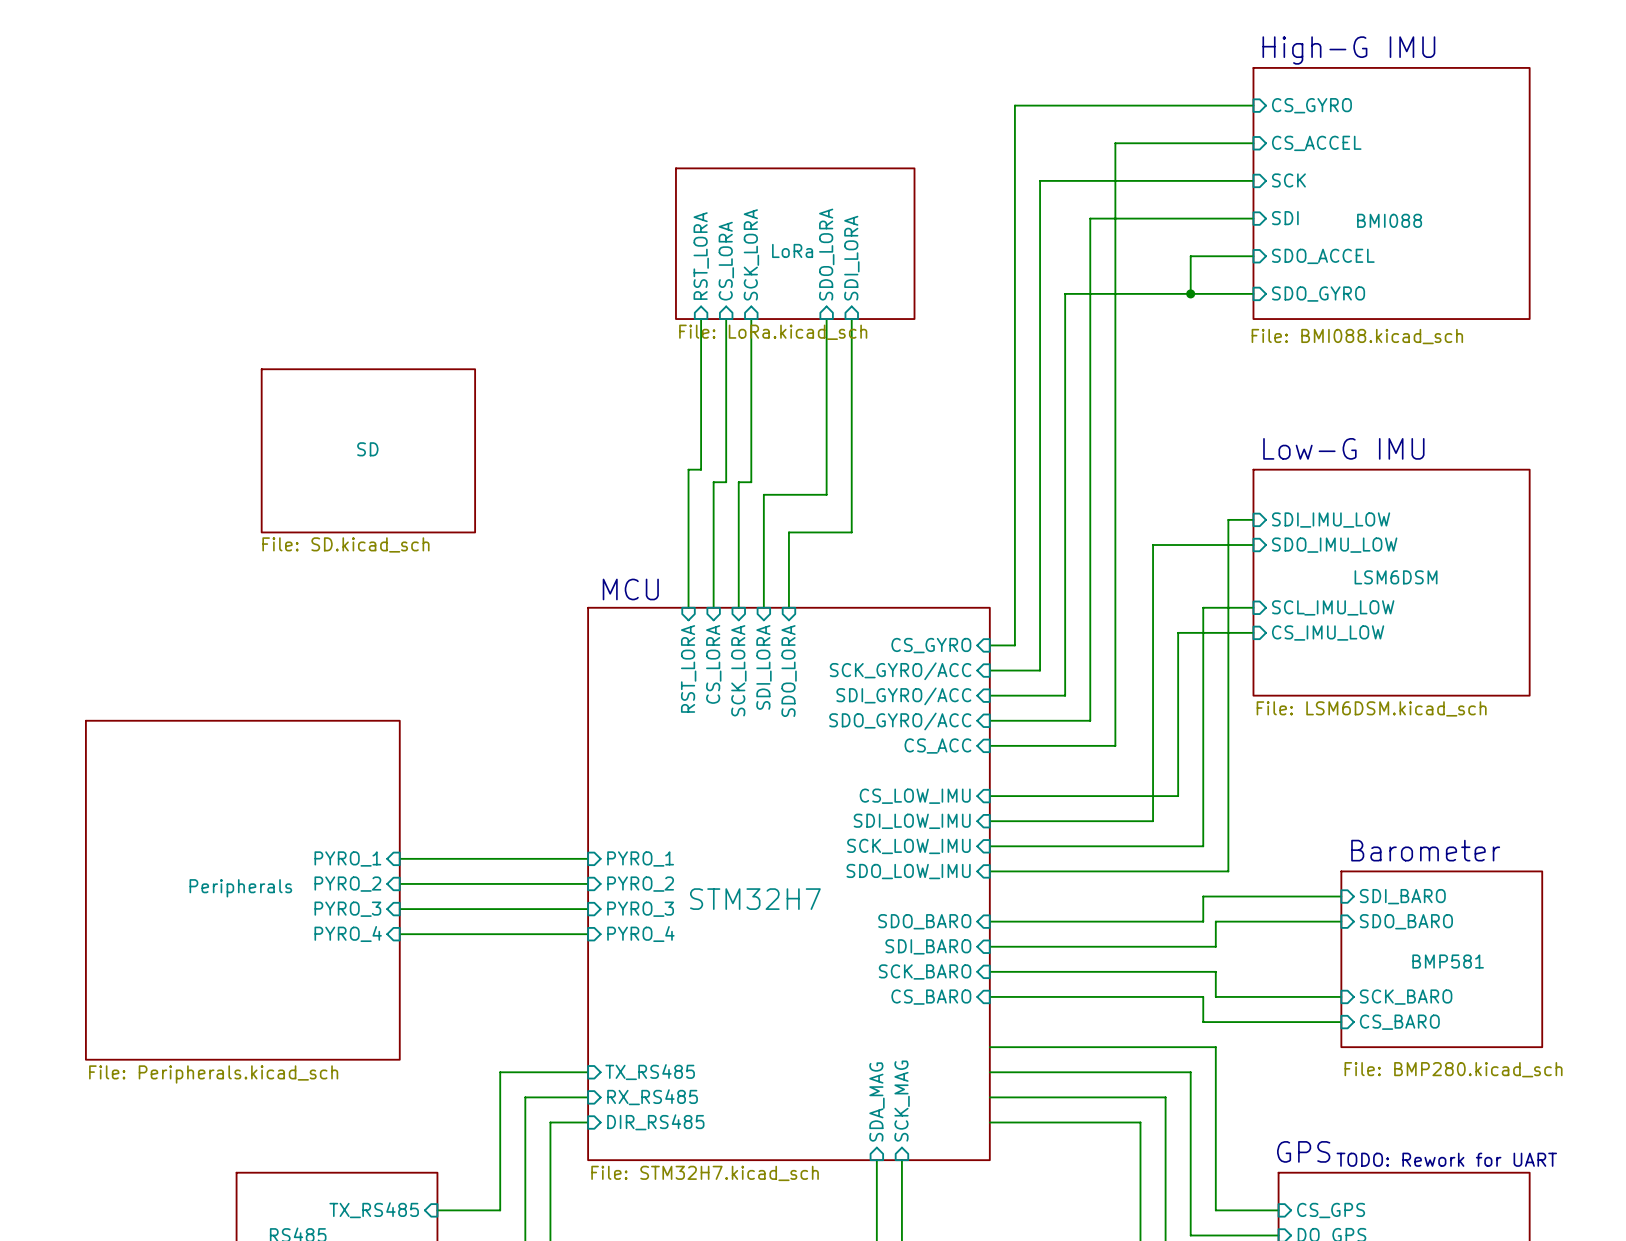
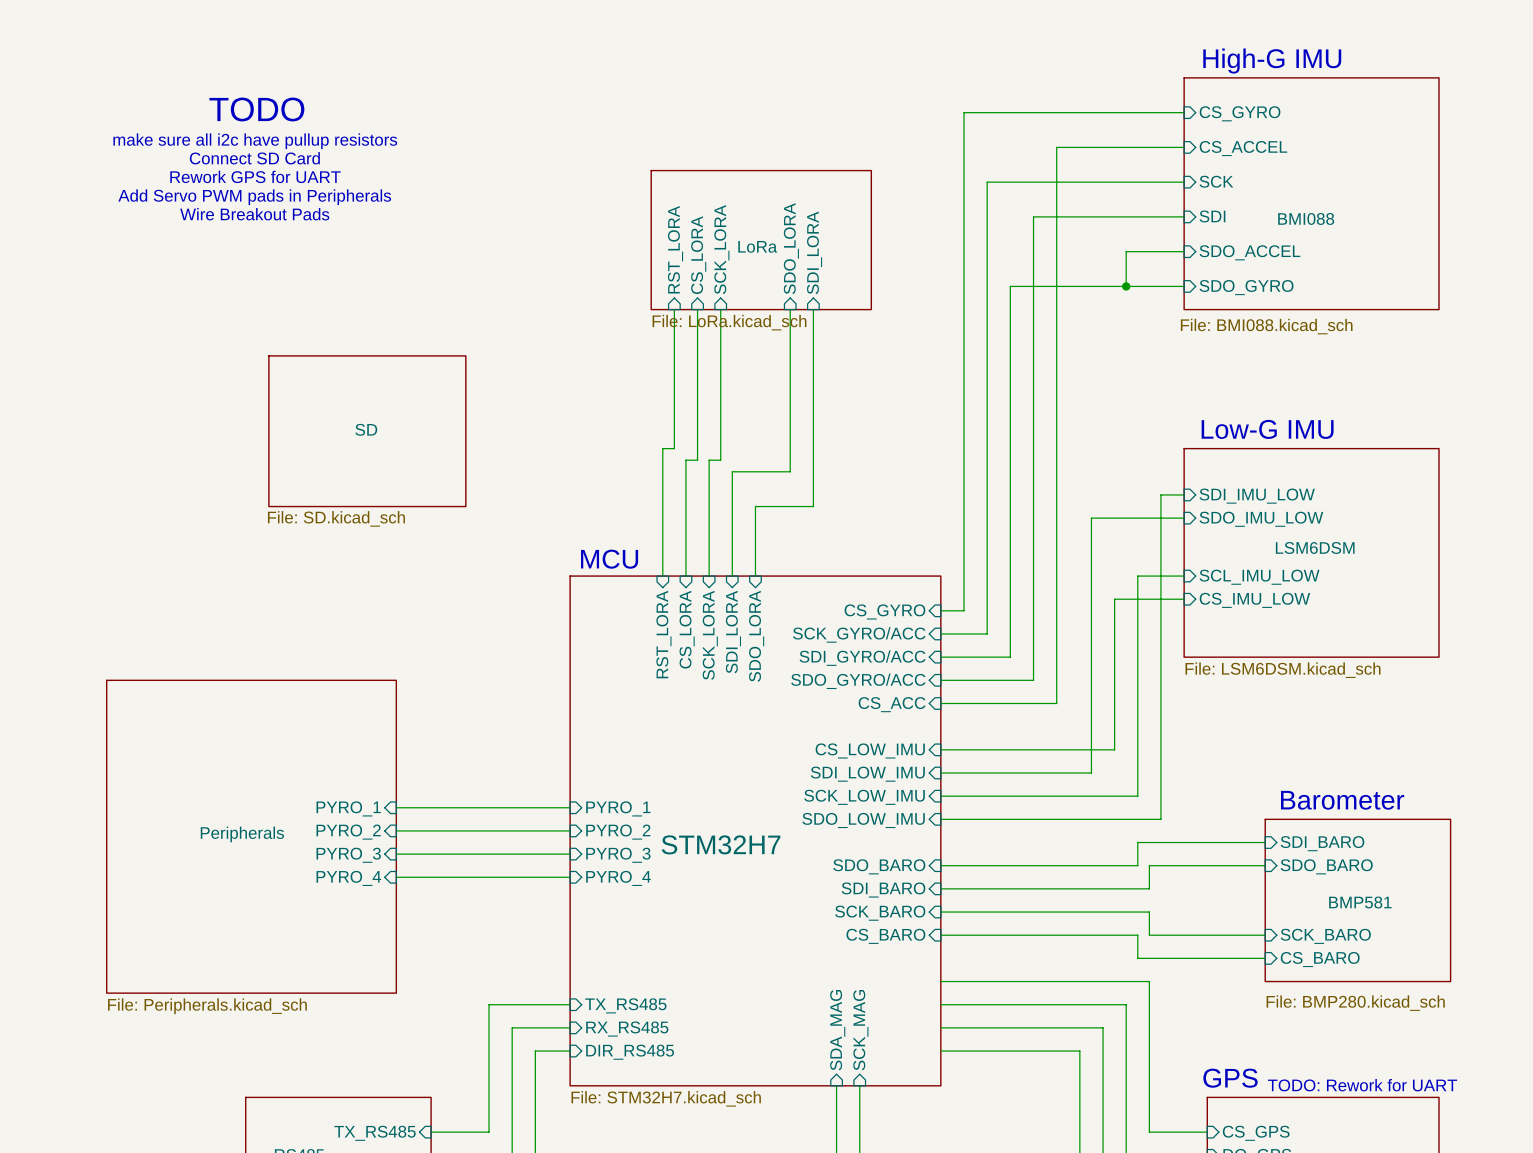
text: none -> TODO (256, 109)
text: none -> make sure all i2c have pullup resistors (255, 141)
text: none -> Connect SD Card (254, 158)
text: none -> Rework GPS for UART (255, 176)
text: none -> Add Servo PWM pads in Peripherals (254, 197)
text: none -> Wire Breakout Pads (254, 214)

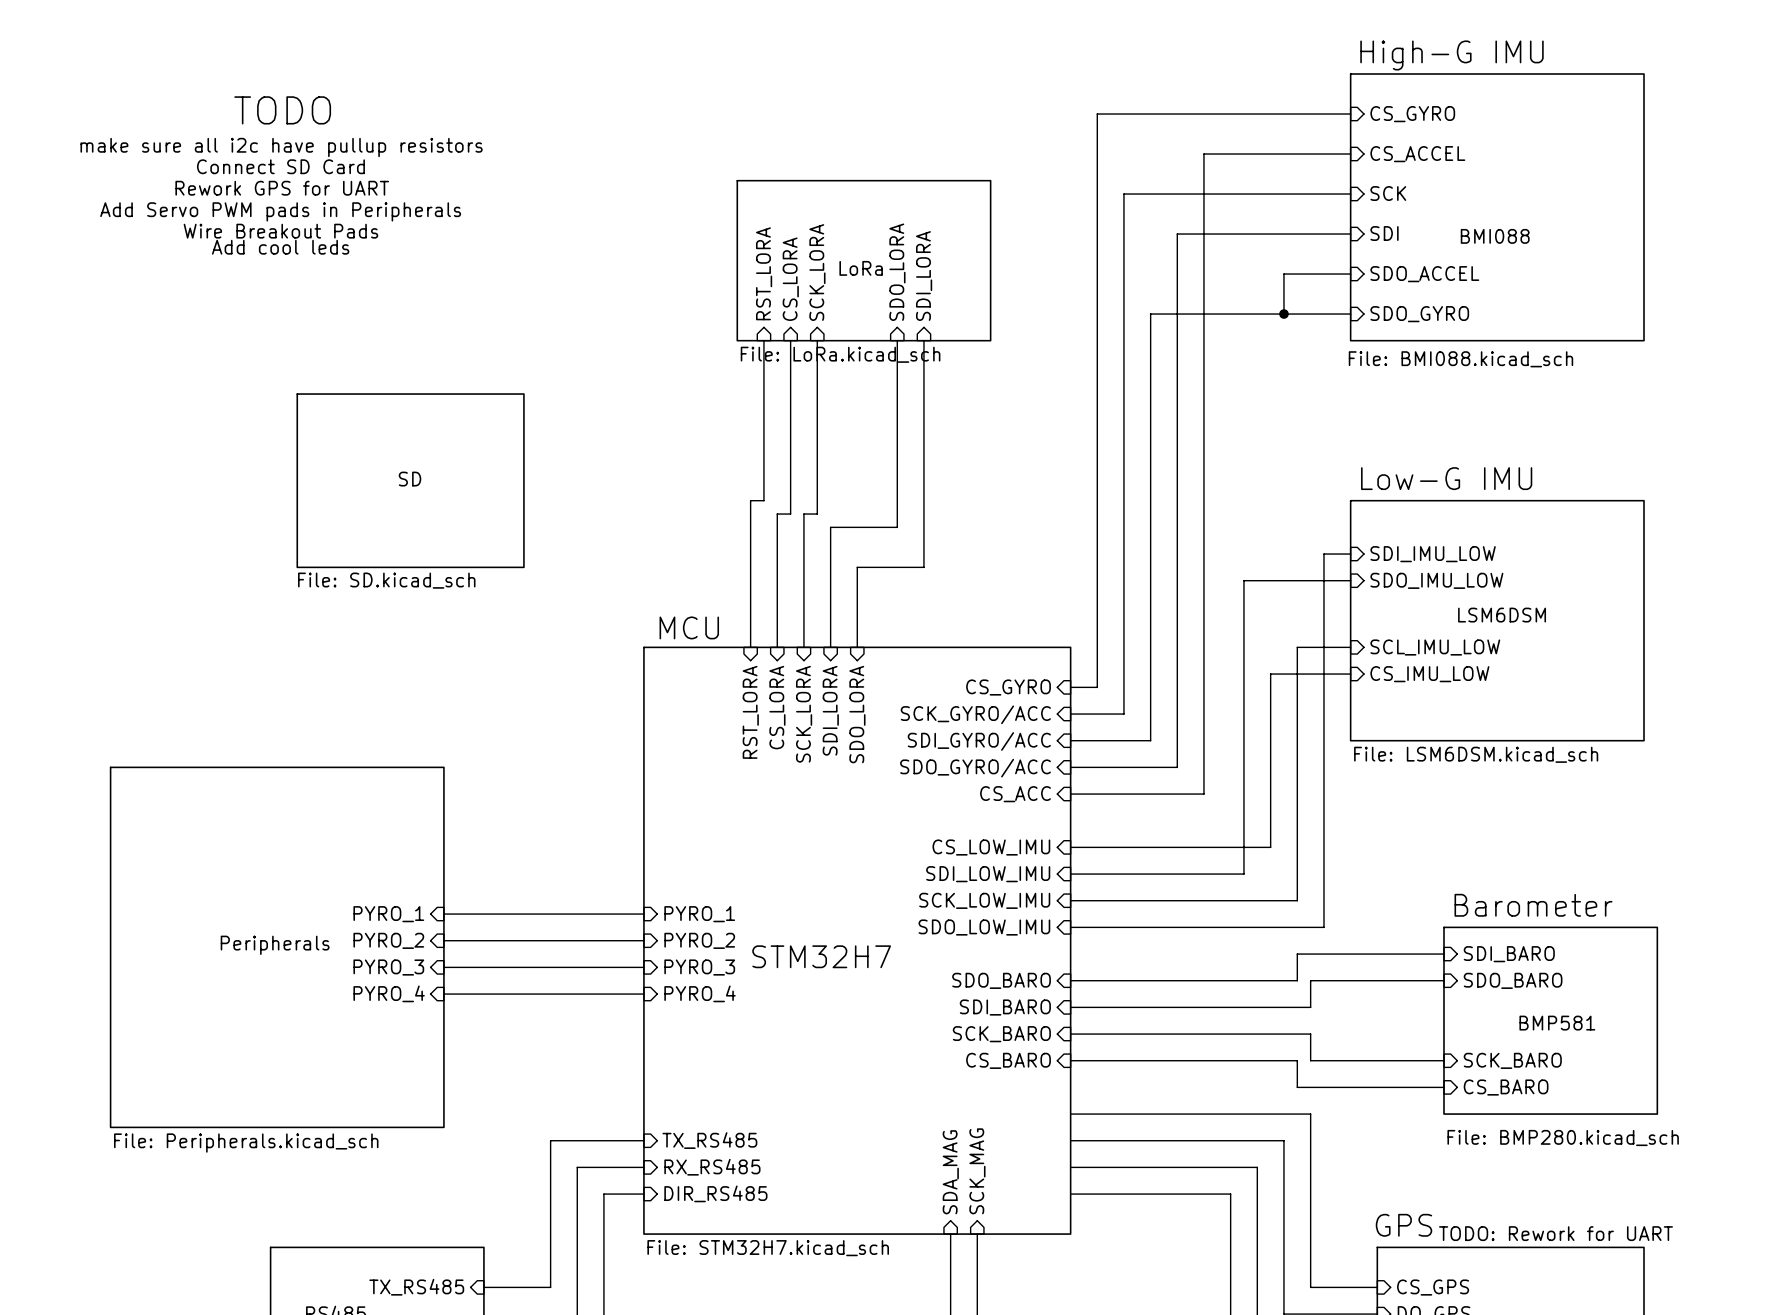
text: none -> Add cool leds (280, 247)

